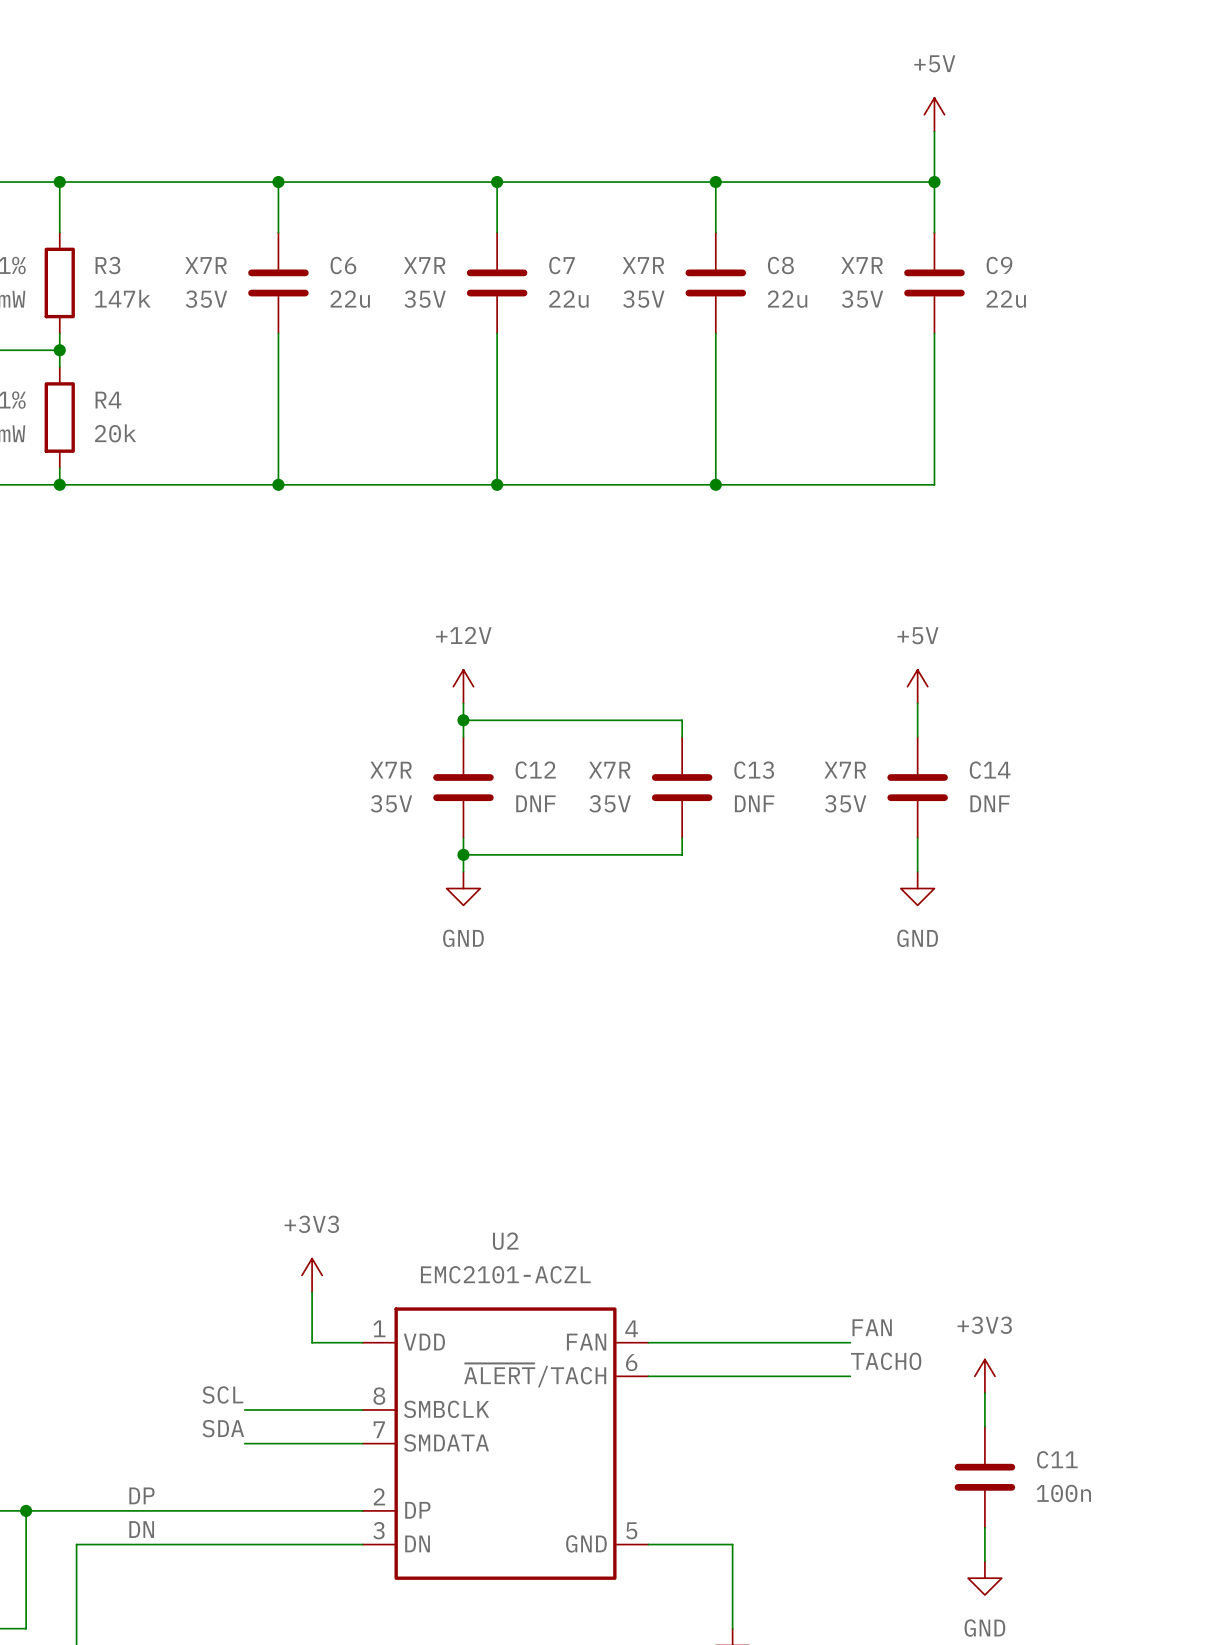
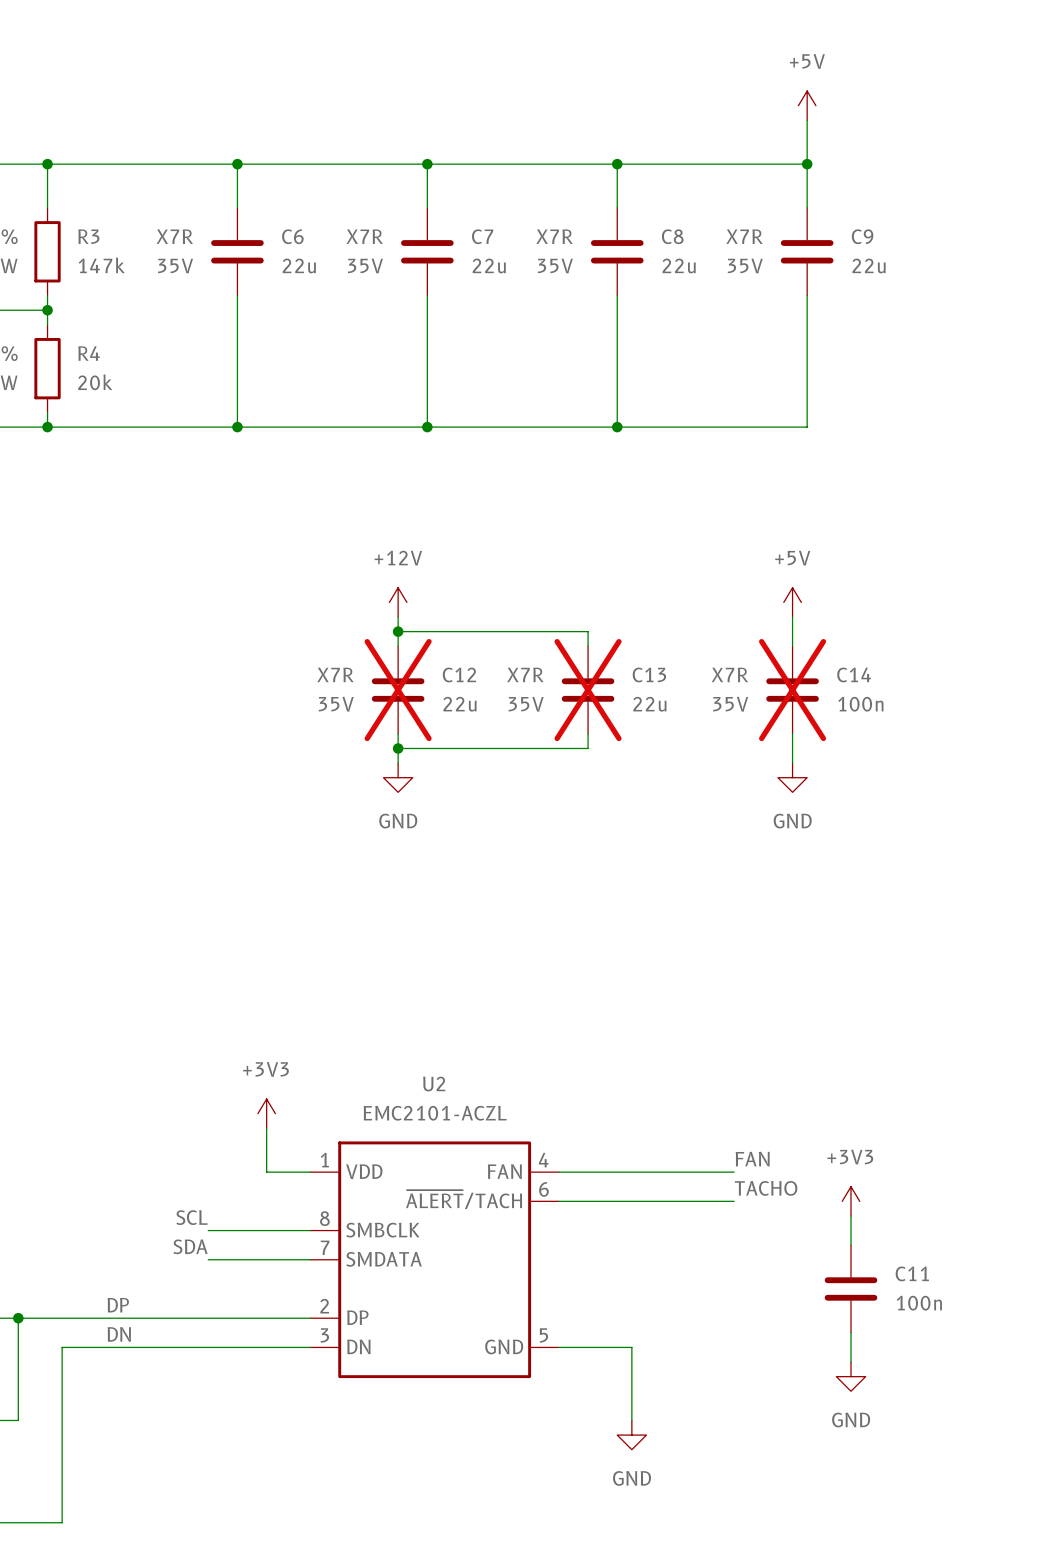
C12 do-not-place cross: none -> (398, 690)
C13 do-not-place cross: none -> (588, 690)
C14 do-not-place cross: none -> (792, 690)
C12 value: DNF (535, 803) -> 22u (459, 704)
C13 value: DNF (754, 803) -> 22u (649, 704)
C14 value: DNF (990, 803) -> 100n (860, 704)

